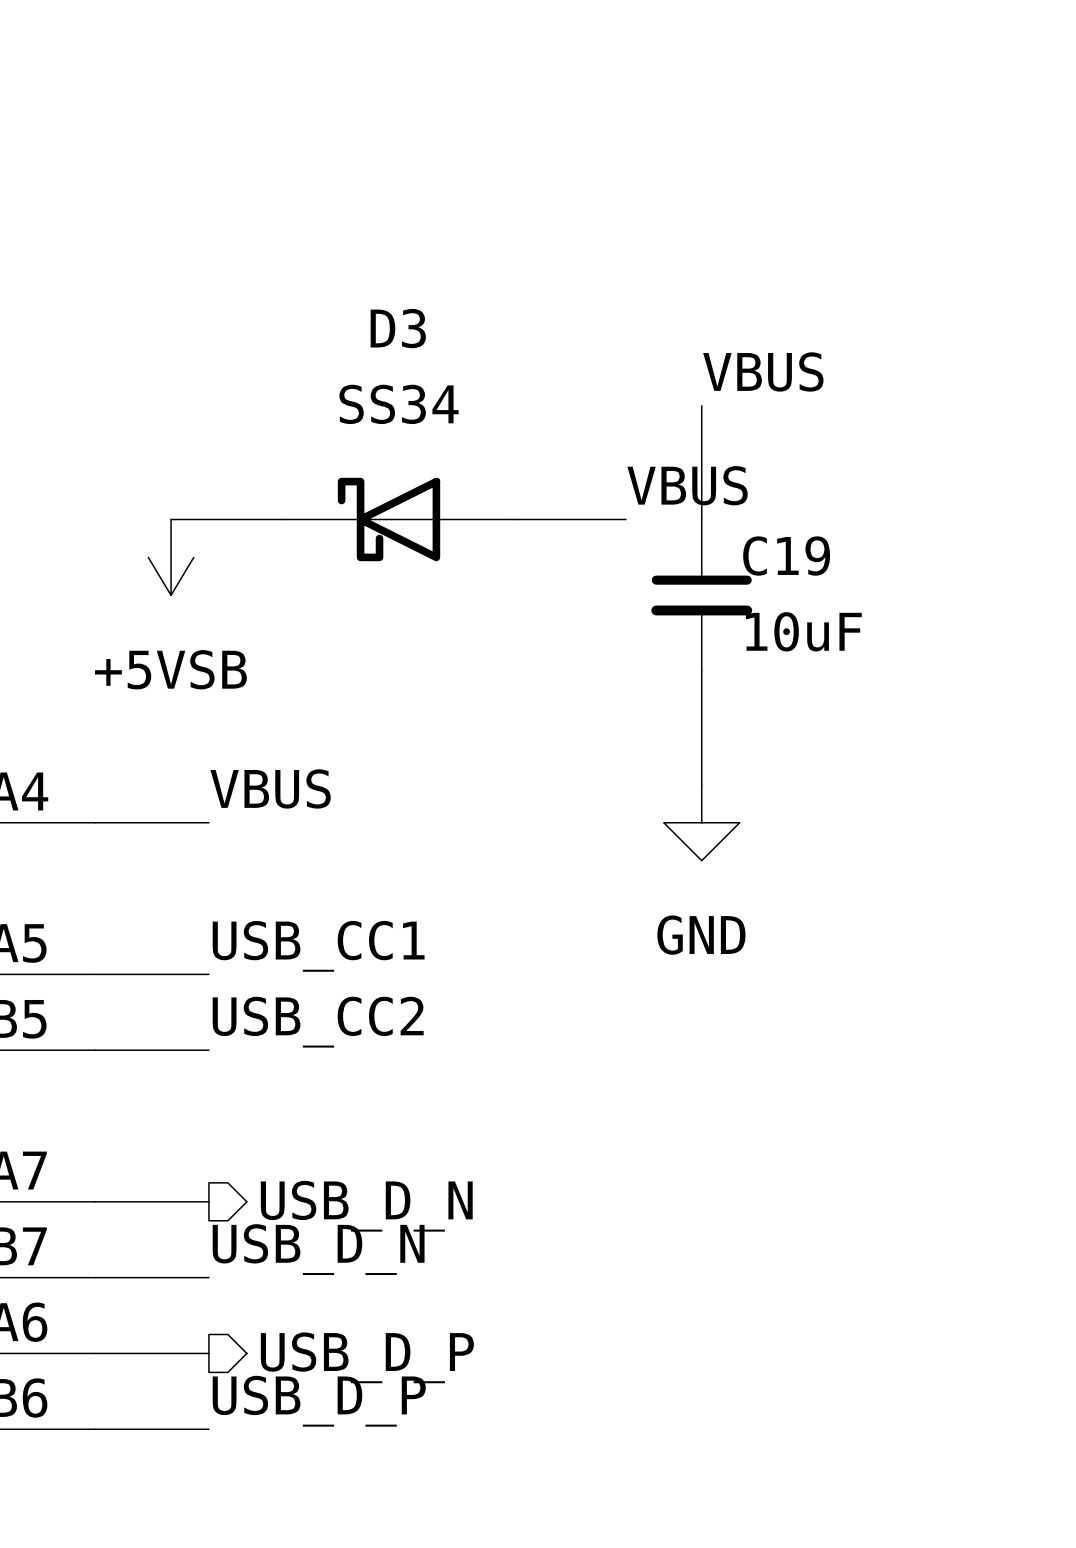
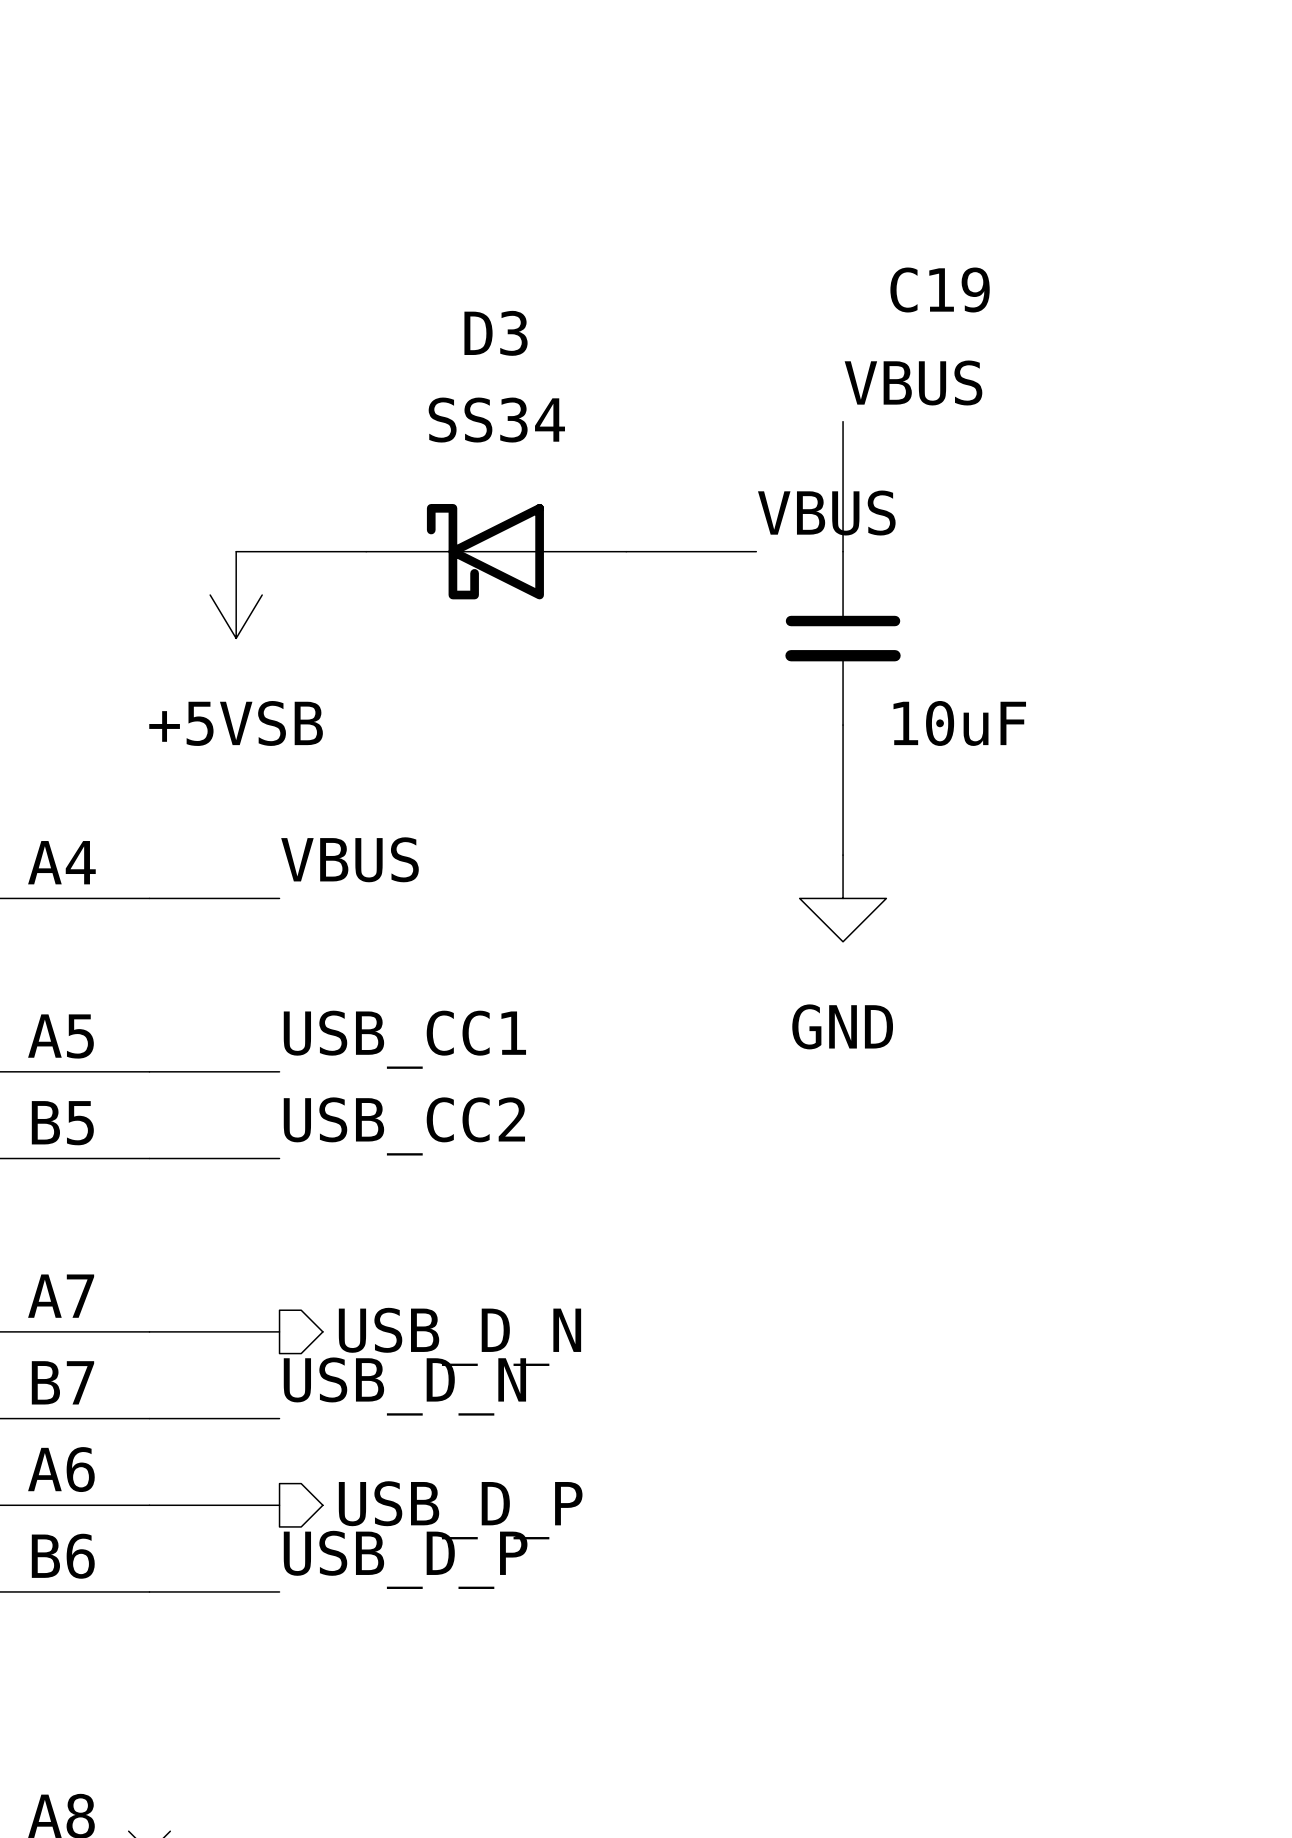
C19 name position: C19 (786, 556) -> C19 (940, 290)
C19 value position: 10uF (803, 631) -> 10uF (959, 723)

